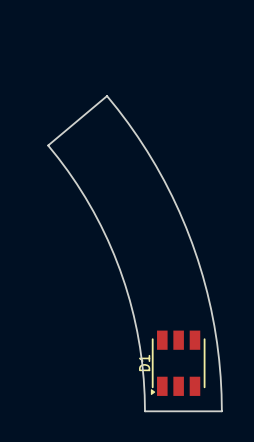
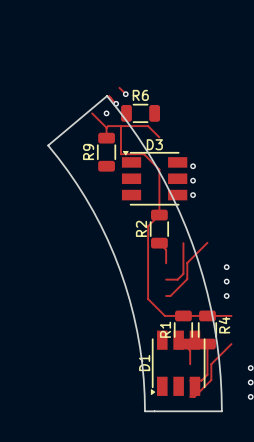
track: none -> (119, 87) (125, 94)
via: none -> (125, 94)
track: none -> (111, 98) (109, 96) (116, 103)
via: none -> (116, 103)
track: none -> (92, 113) (106, 127)
via: none -> (106, 113)
R6: none -> (140, 113)
track: none -> (120, 126) (120, 154) (144, 154) (159, 169) (159, 215) (148, 226) (148, 299) (164, 315) (231, 315)
track: none -> (106, 127) (106, 138)
track: none -> (106, 127) (108, 126) (148, 126) (159, 137)
R9: none -> (106, 152)
via: none -> (193, 166)
D3: none -> (154, 178)
via: none -> (193, 180)
via: none -> (193, 195)
R2: none -> (159, 229)
track: none -> (207, 242) (187, 262) (187, 279) (170, 295) (166, 295)
track: none -> (159, 243) (166, 249) (166, 263)
track: none -> (183, 243) (183, 273) (177, 279) (166, 279)
via: none -> (226, 267)
via: none -> (226, 281)
via: none -> (226, 295)
R1: none -> (183, 329)
R4: none -> (207, 329)
track: none -> (183, 344) (190, 350) (190, 364)
track: none -> (207, 344) (207, 374) (201, 380) (190, 380)
track: none -> (231, 344) (211, 364) (211, 380) (194, 396) (190, 396)
via: none -> (250, 368)
via: none -> (250, 382)
via: none -> (250, 396)

